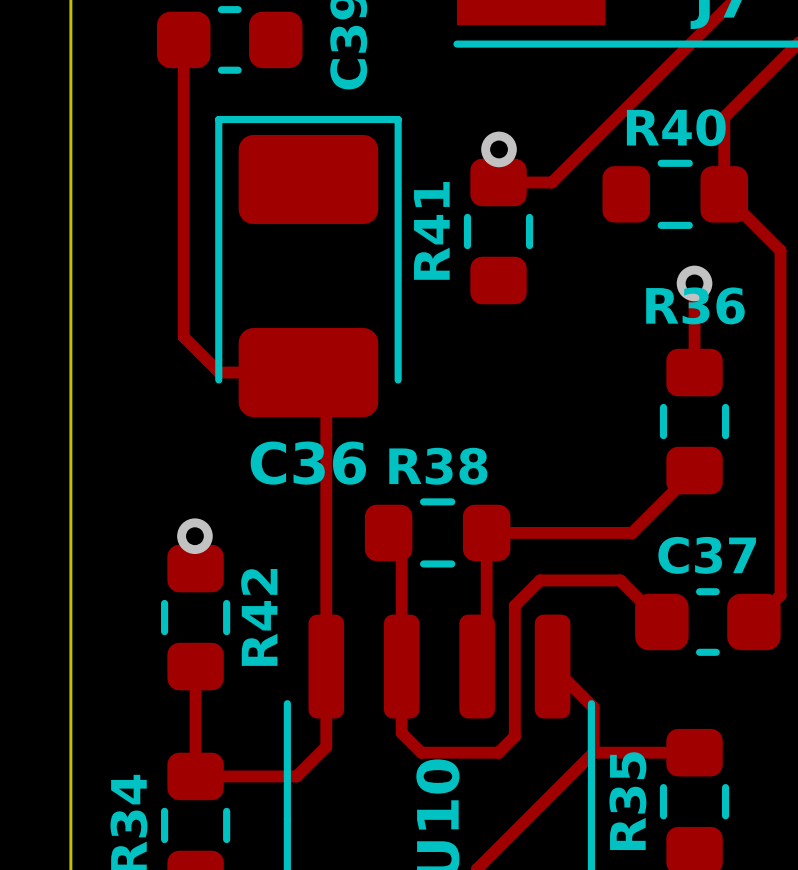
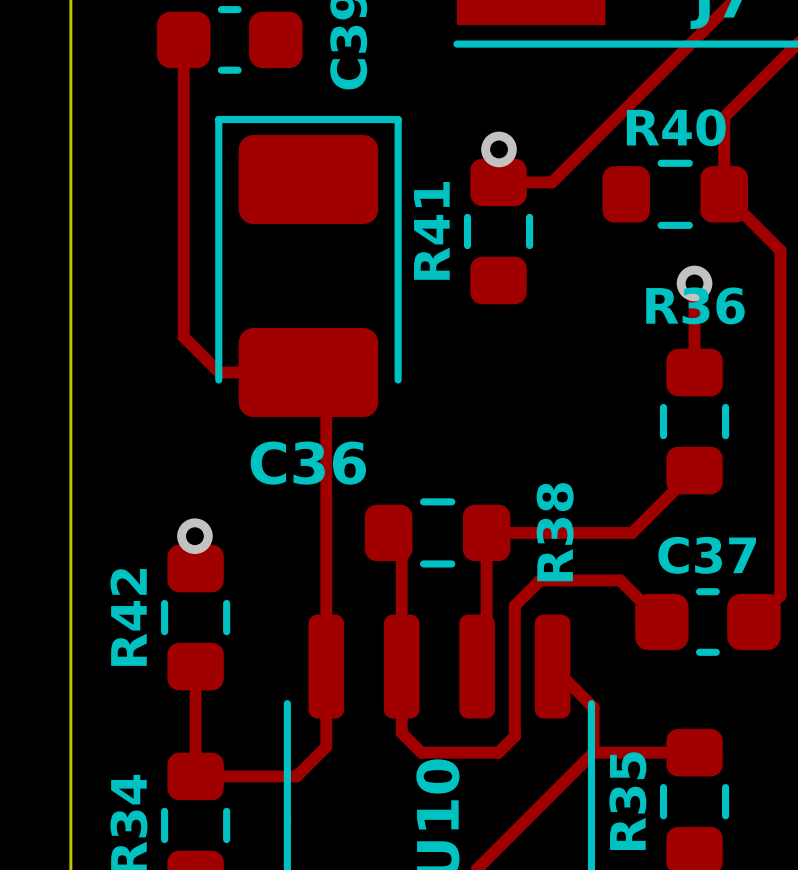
R38 name rotation: 0° (438, 466) -> 90° counterclockwise (555, 532)
R38 name position: R38 (438, 466) -> R38 (555, 532)
R42 name position: R42 (259, 617) -> R42 (128, 617)

